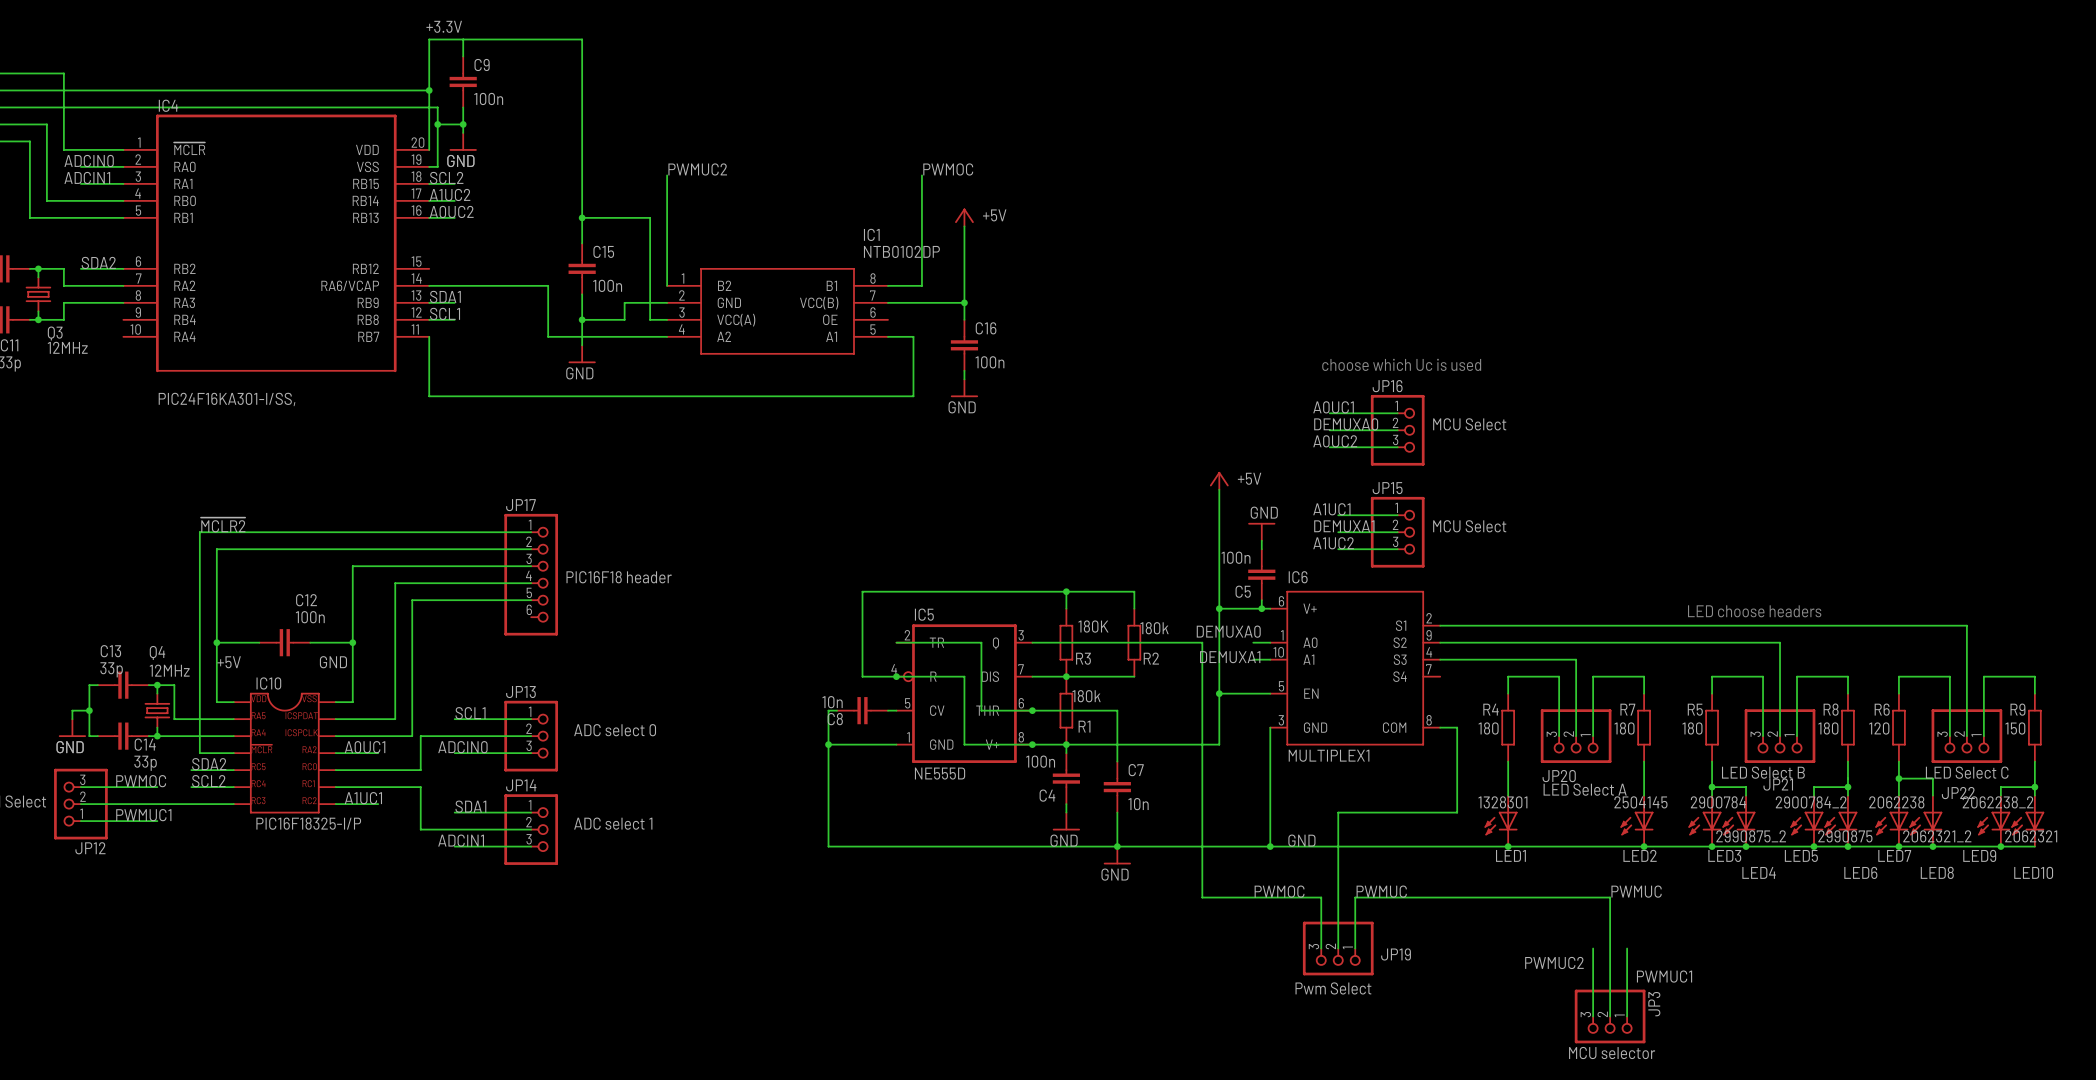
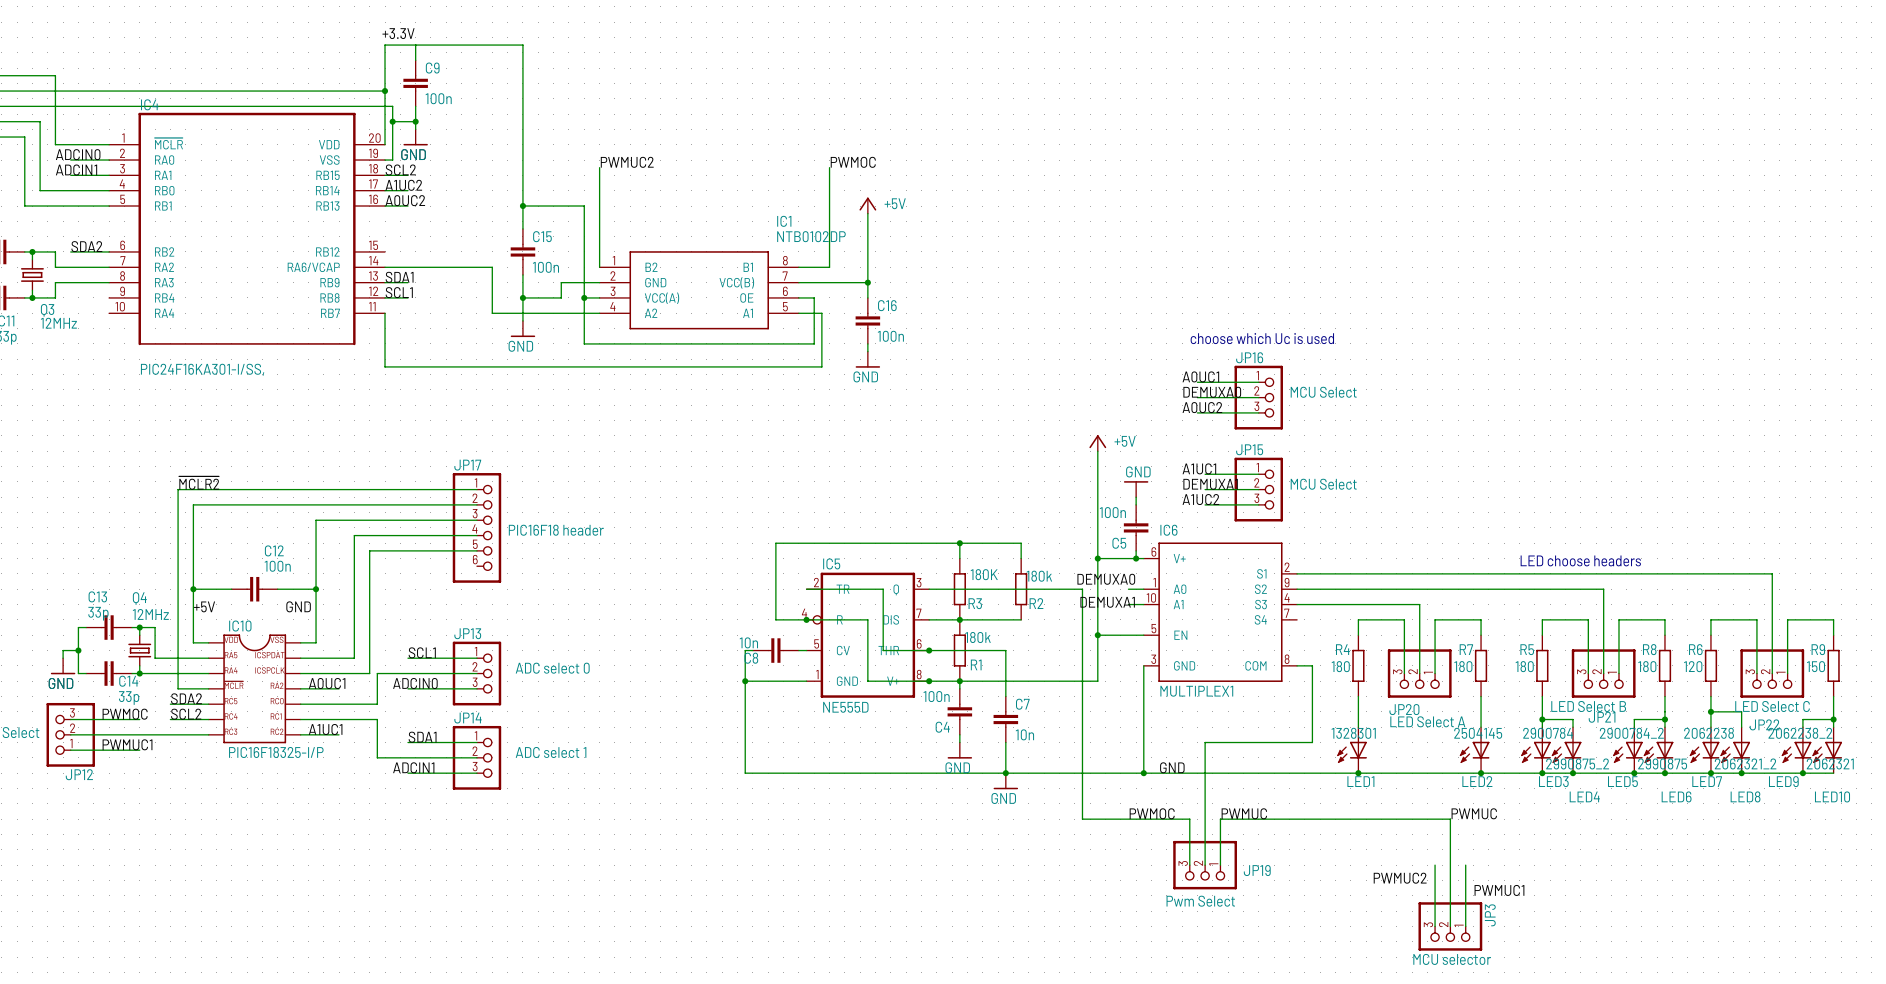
wire: none -> (584, 297) (584, 343) (814, 343) (814, 297) (798, 297)
junction: none -> (584, 297)

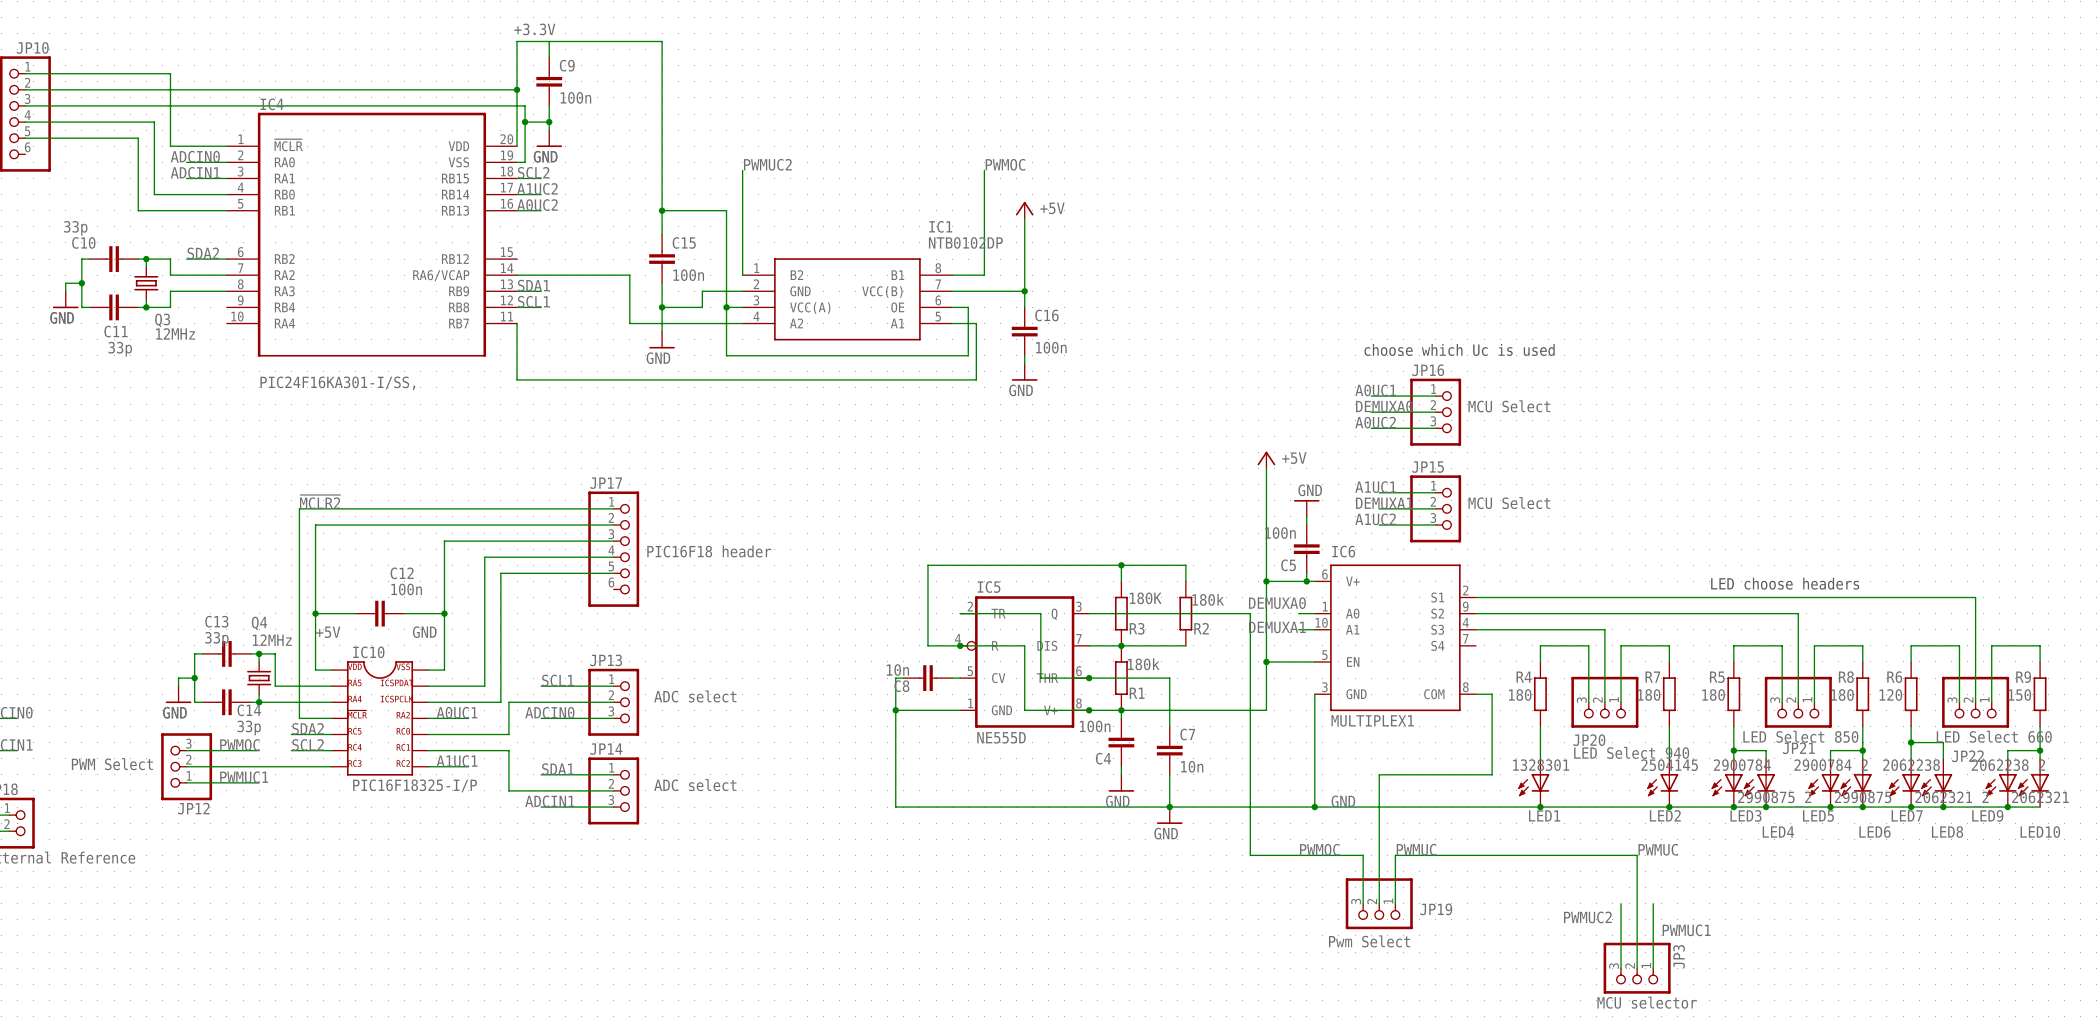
JP13 value: ADC select 0 (552, 668) -> ADC select (695, 696)
JP21 value: LED Select B (1588, 706) -> LED Select 850 (1800, 736)
JP22 value: LED Select C (1772, 706) -> LED Select 660 (1994, 736)
JP20 value: LED Select A (1427, 721) -> LED Select 940 (1631, 752)
JP14 value: ADC select 1 (551, 752) -> ADC select (695, 785)

